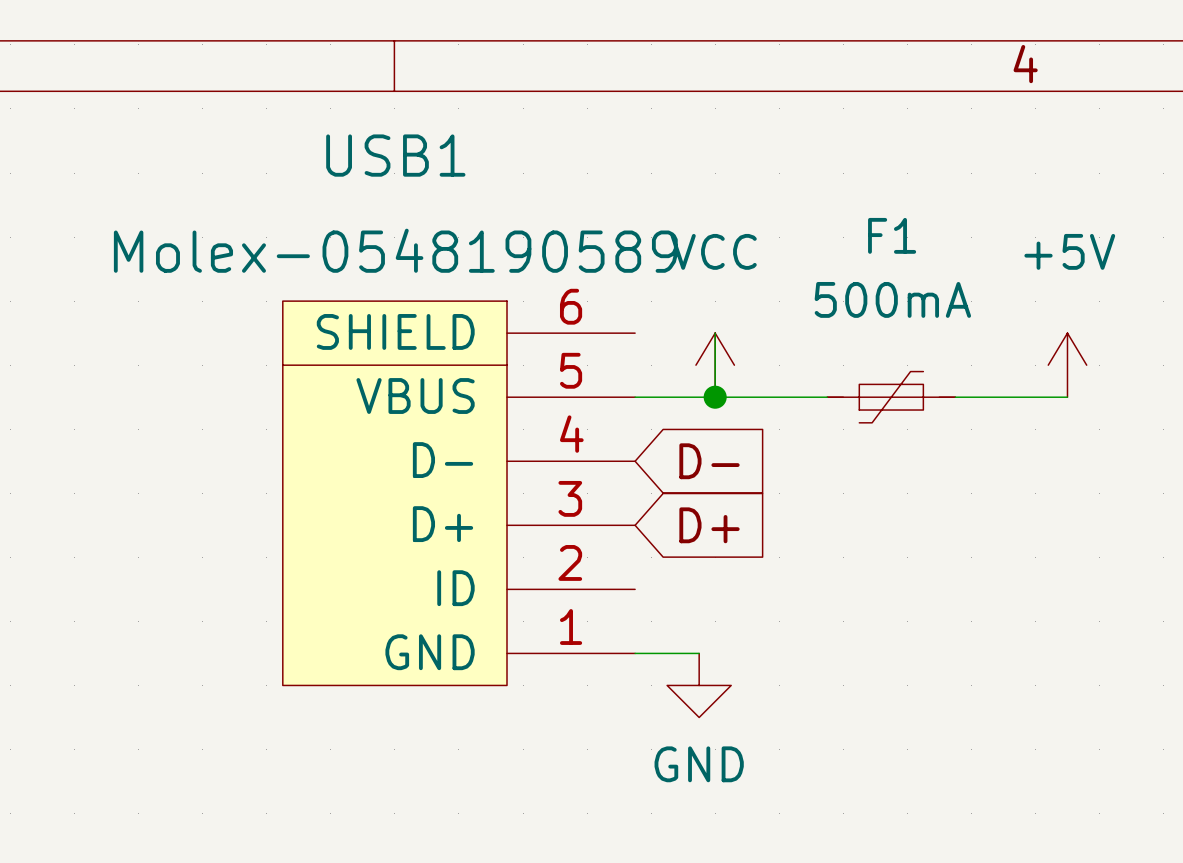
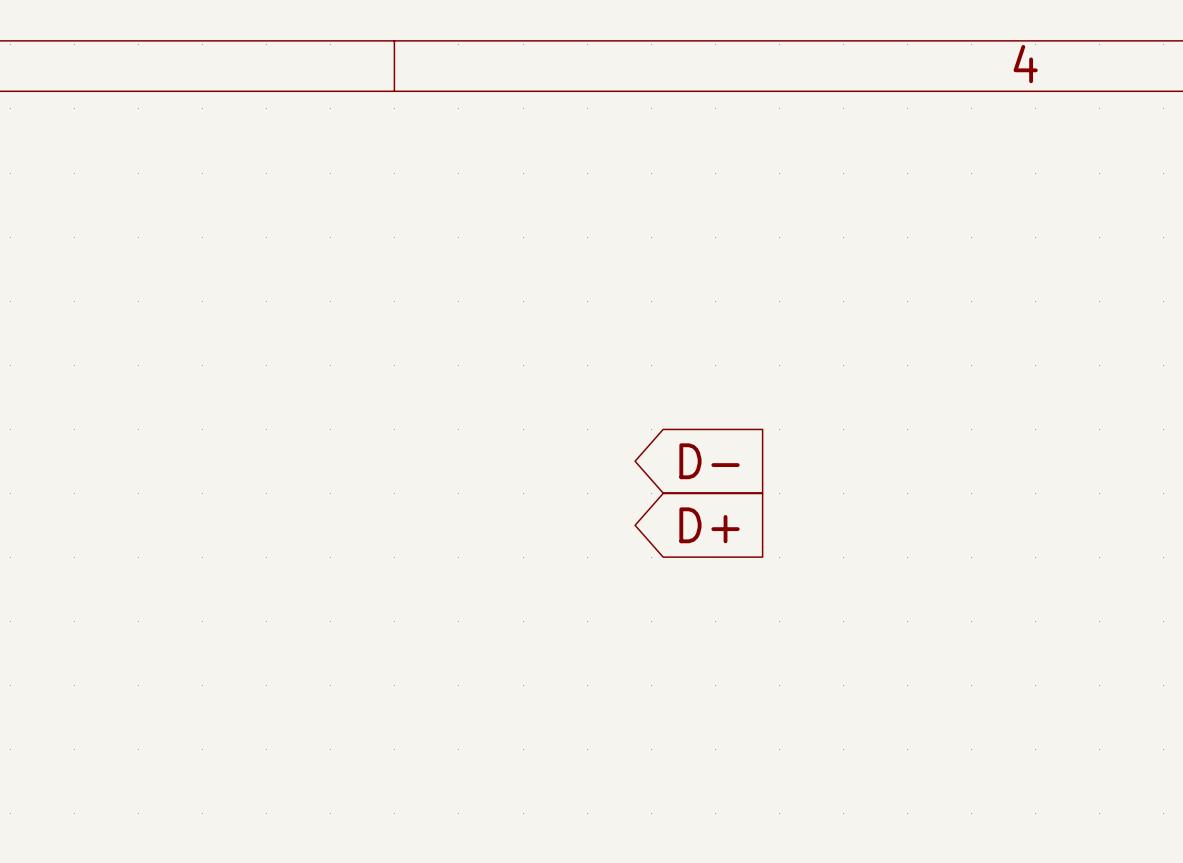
wire: (715, 333) (715, 397) -> none
power symbol: VCC (715, 365) -> none
power symbol: +5V (1067, 365) -> none
wire: (635, 397) (827, 397) -> none
junction: (715, 397) -> none
F1: 500mA (891, 397) -> none
wire: (955, 397) (1067, 397) -> none
USB1: Molex-0548190589 (458, 493) -> none
wire: (635, 653) (699, 653) -> none
power symbol: GND (699, 685) -> none

